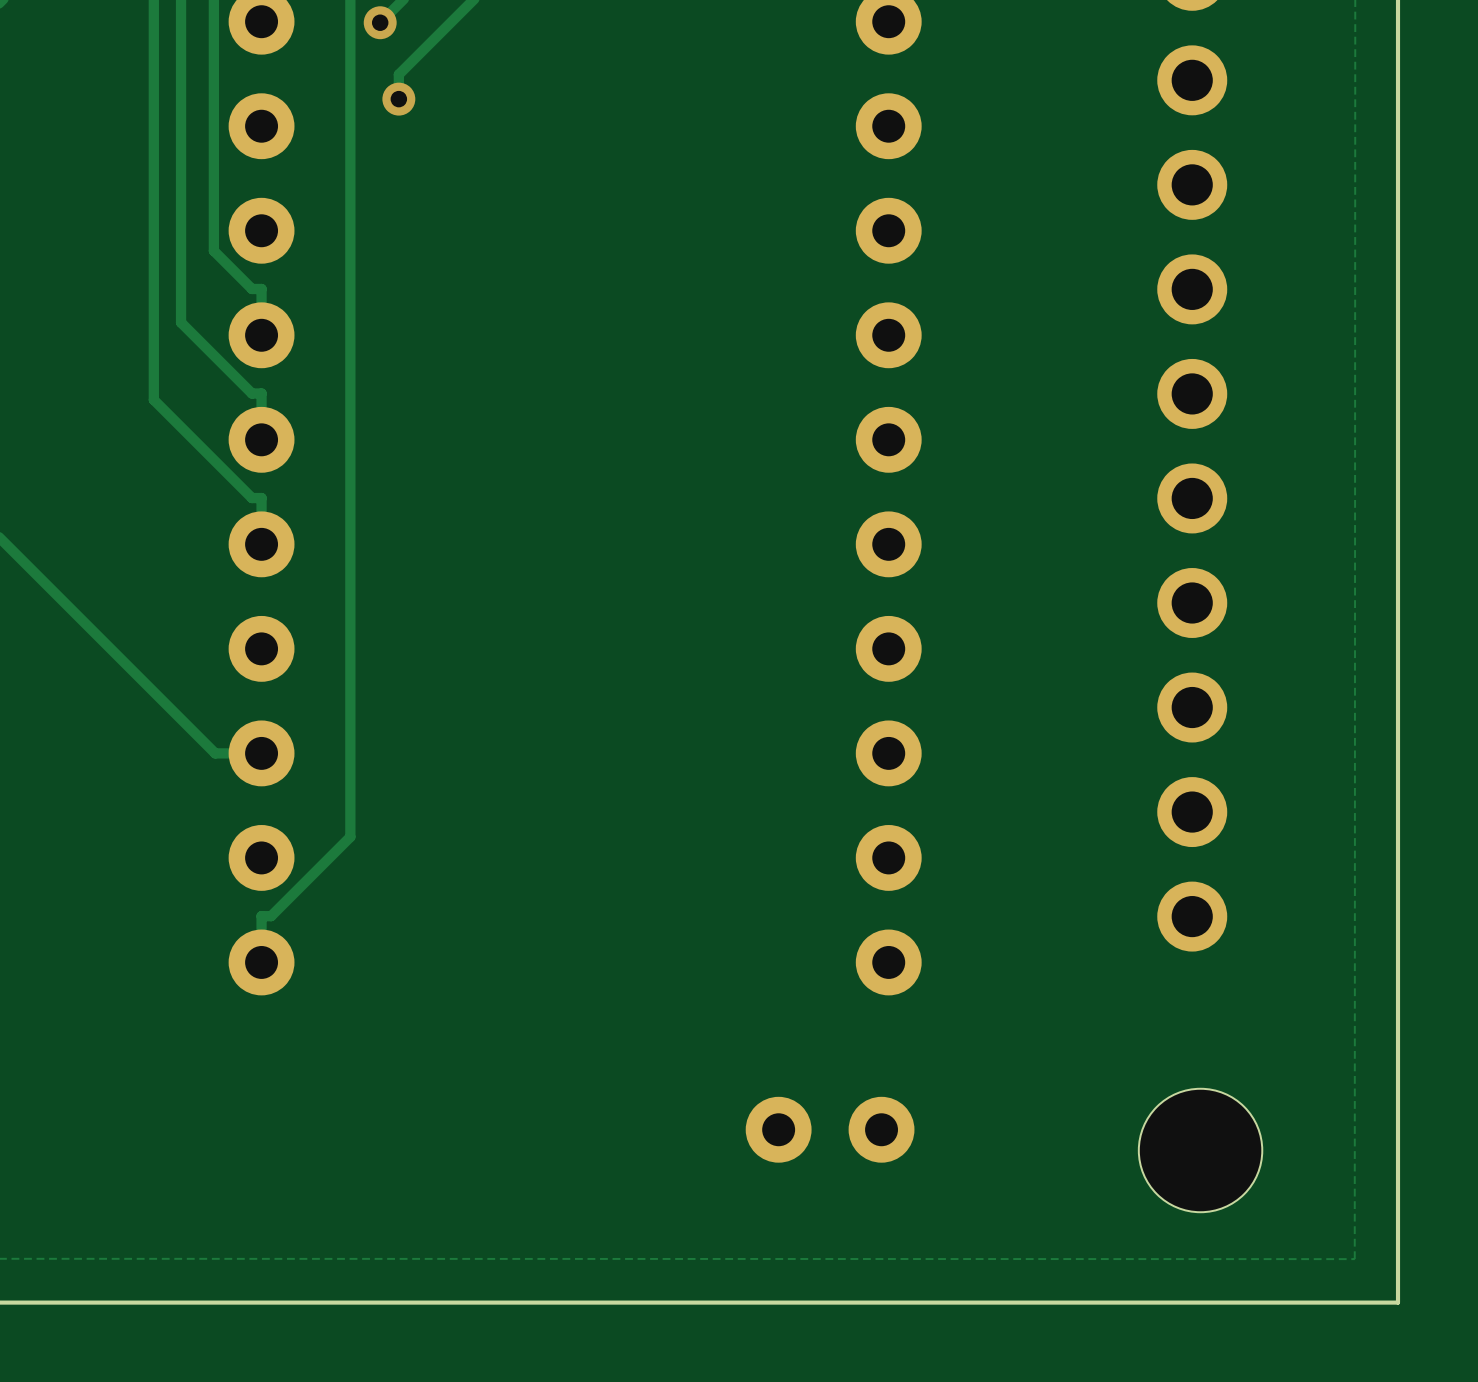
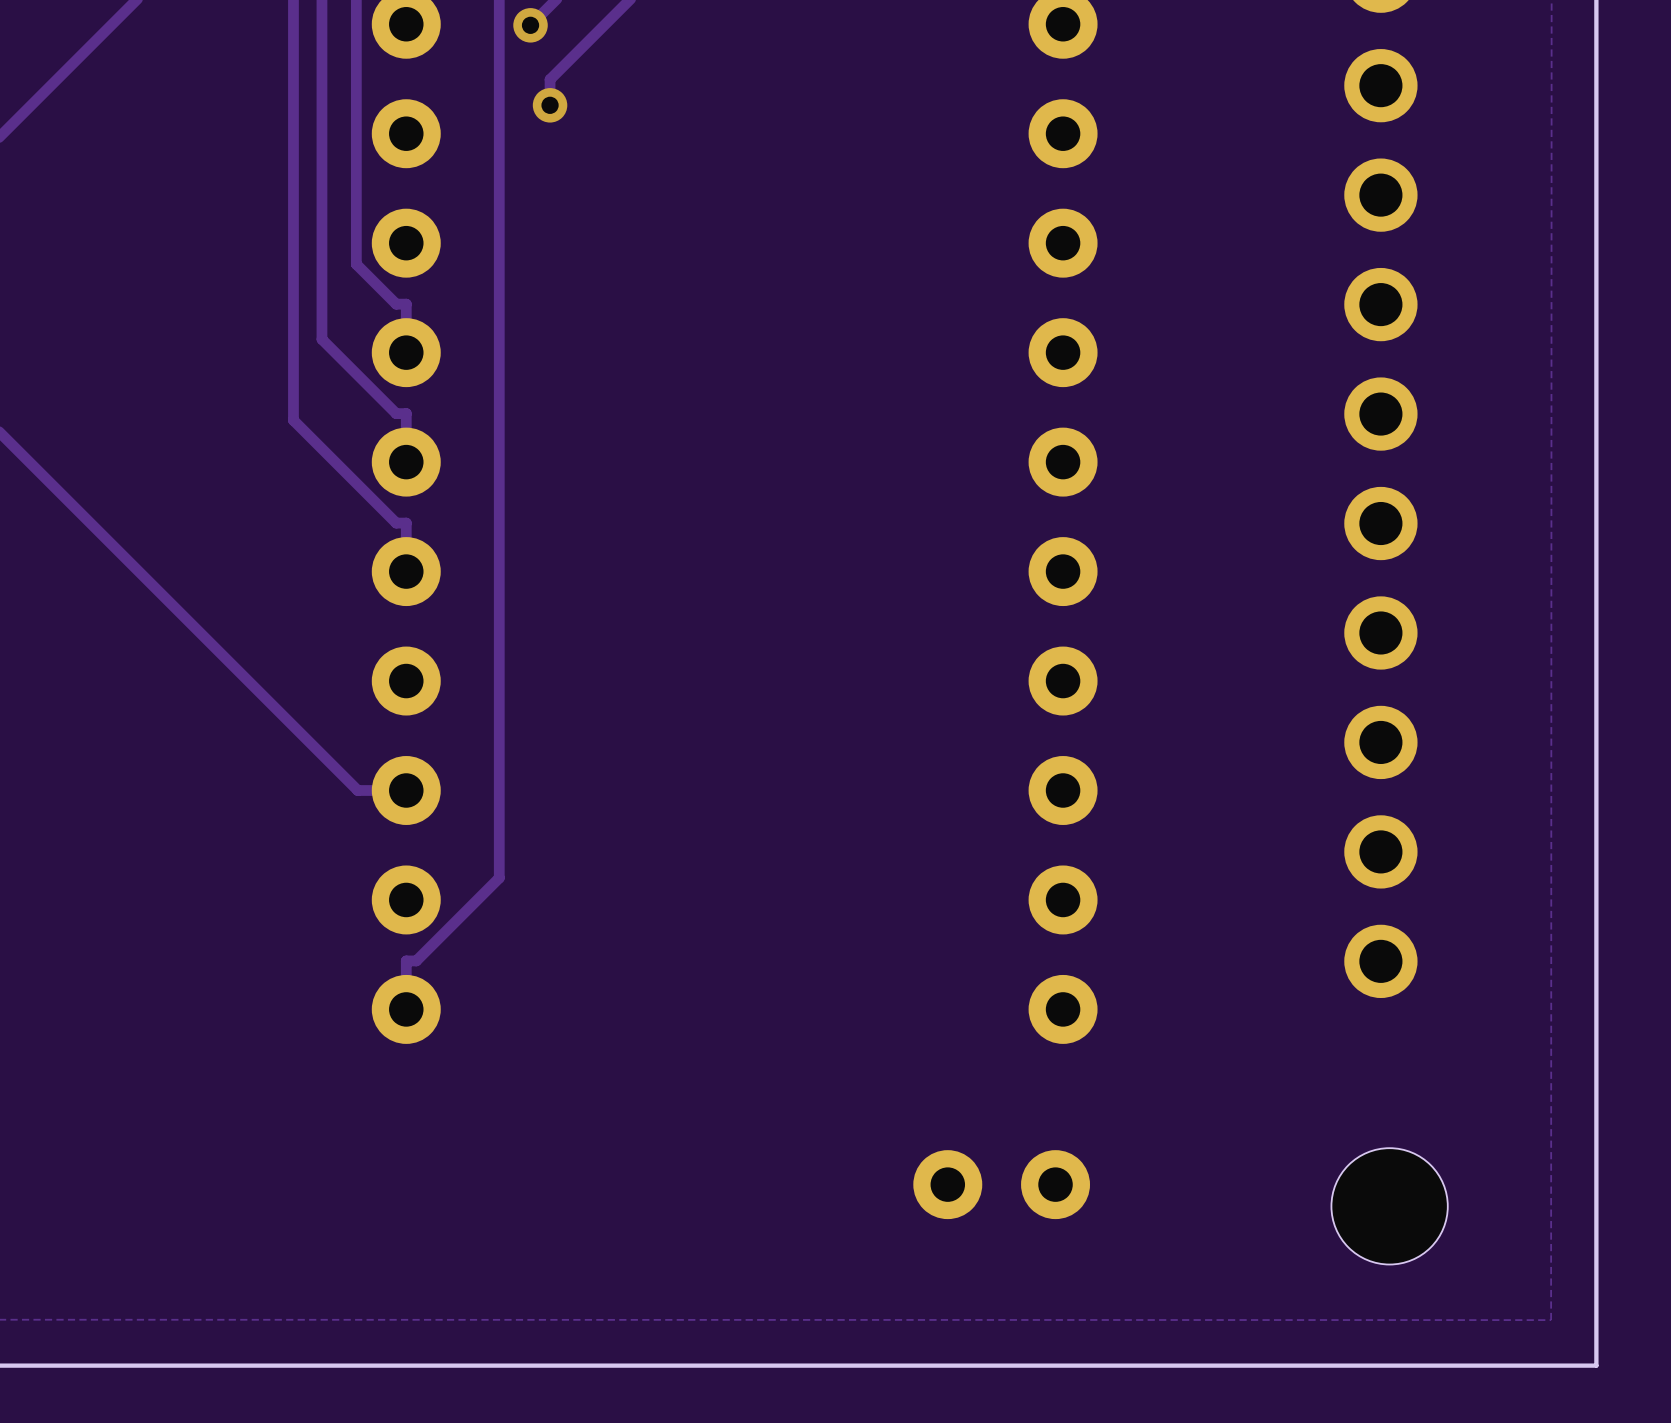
part footprint: [1138, 1088, 1263, 1213] -> [1331, 1148, 1448, 1265]

